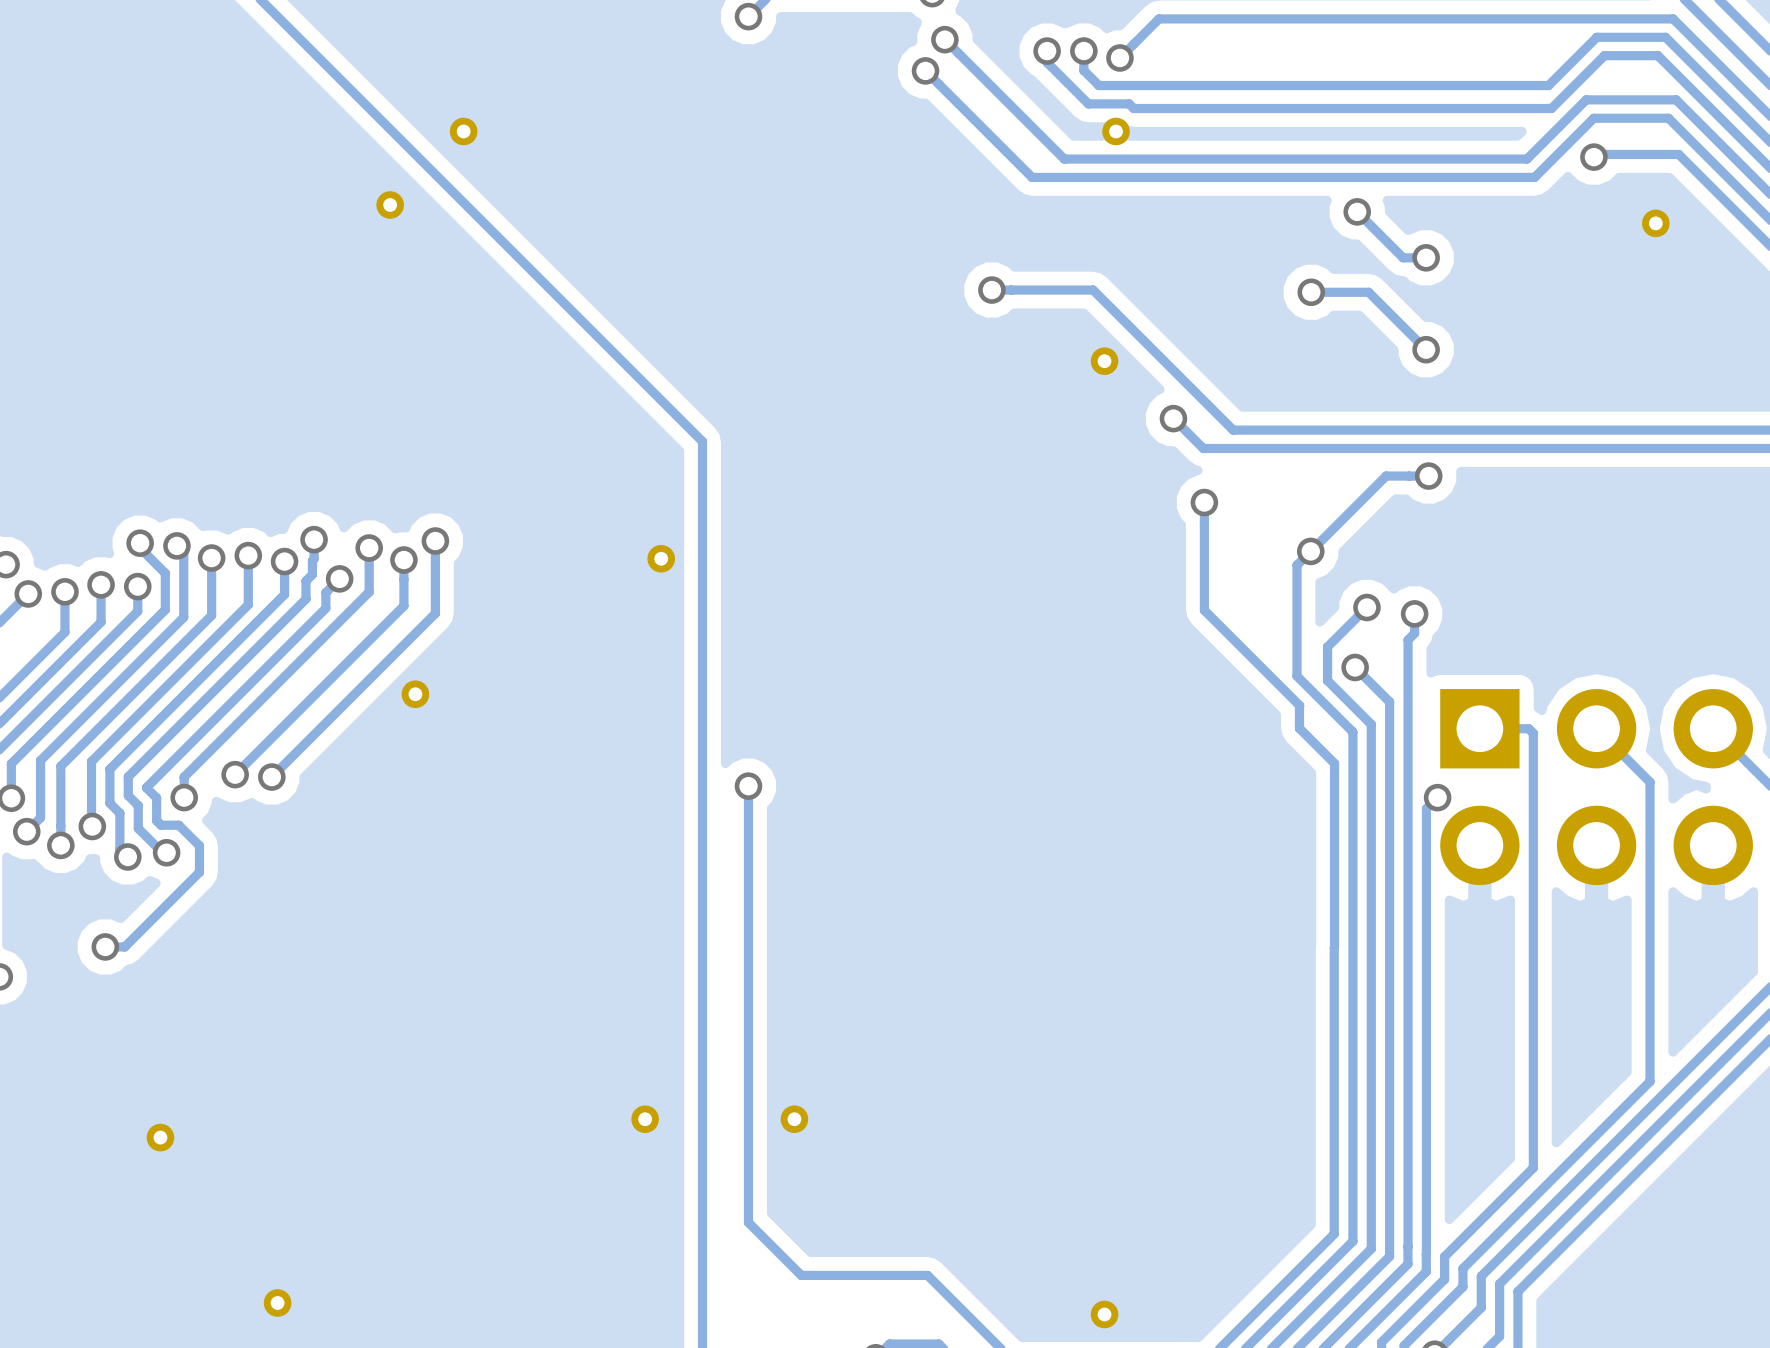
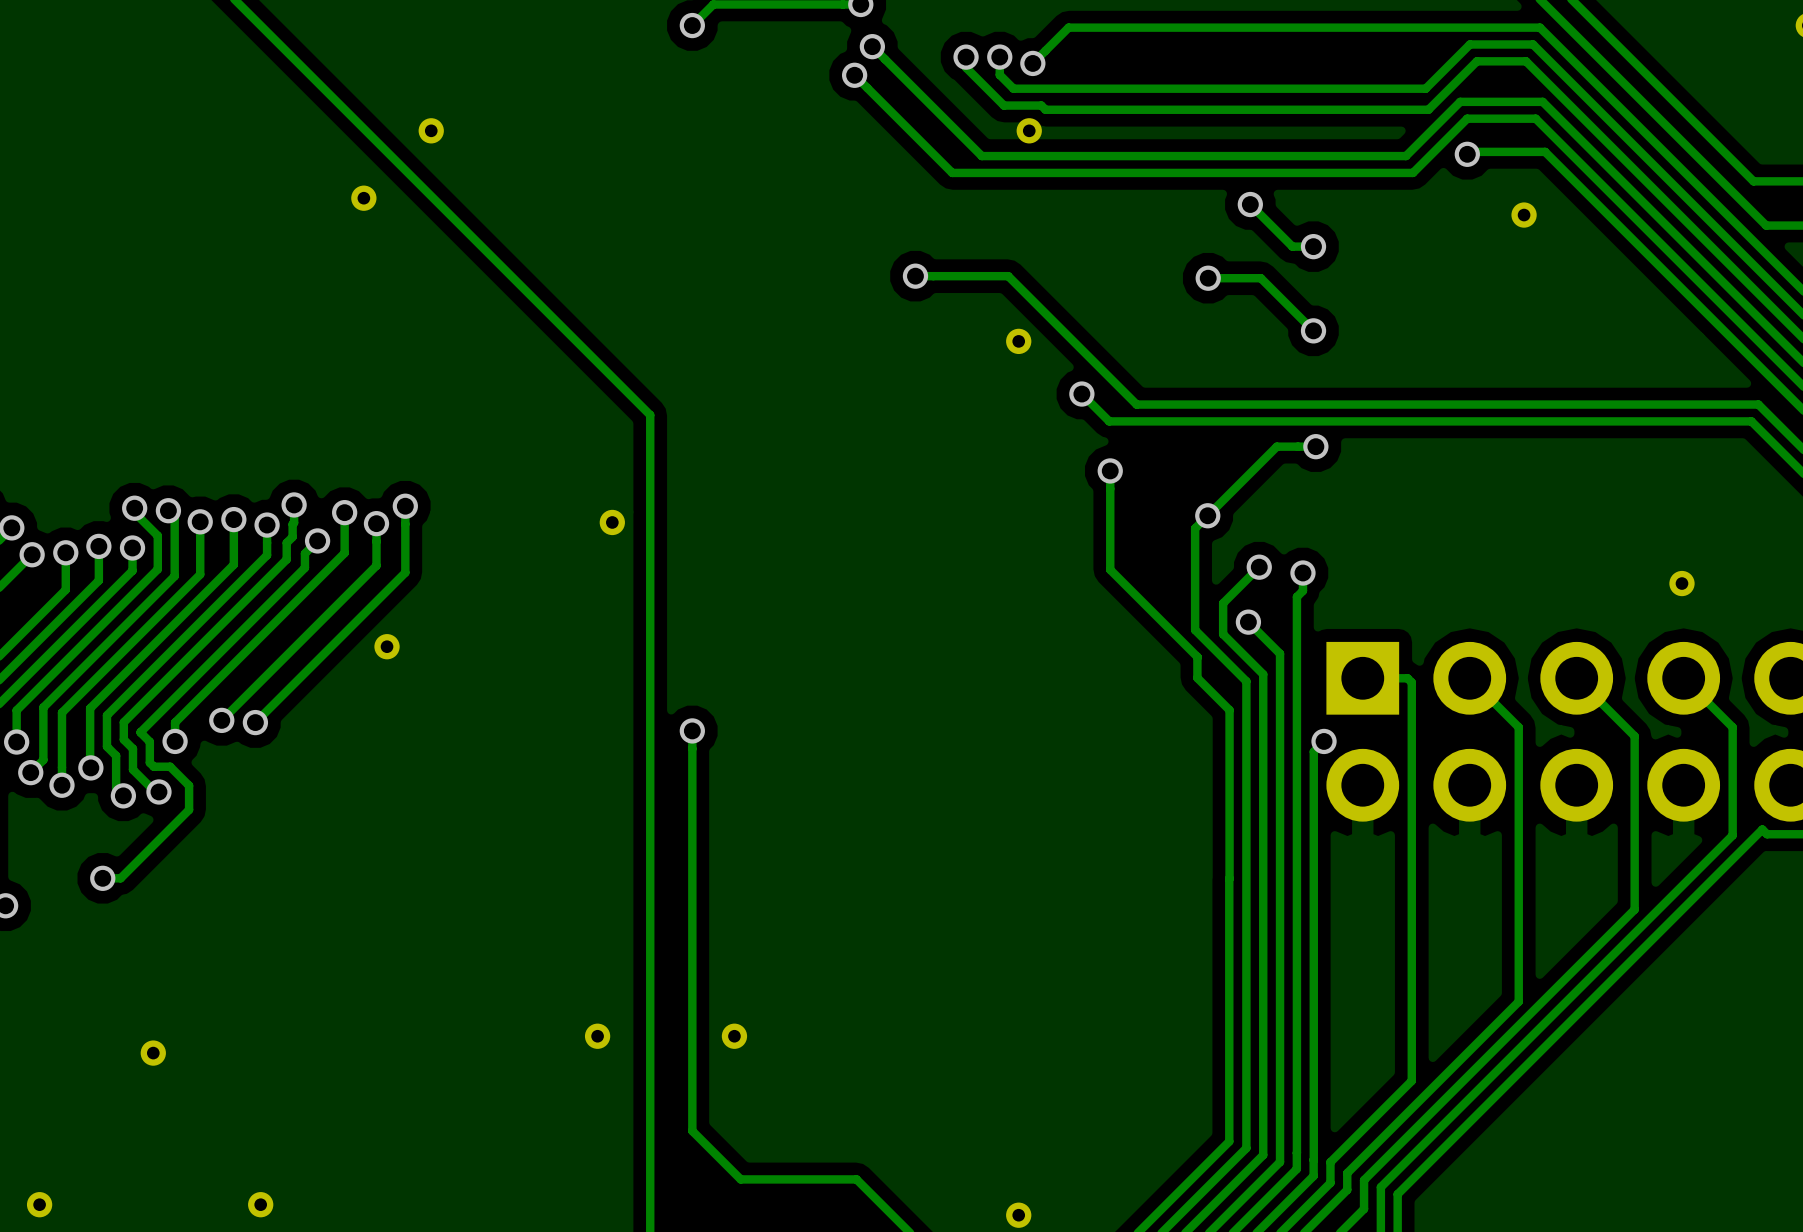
part: none -> (39, 1204)

